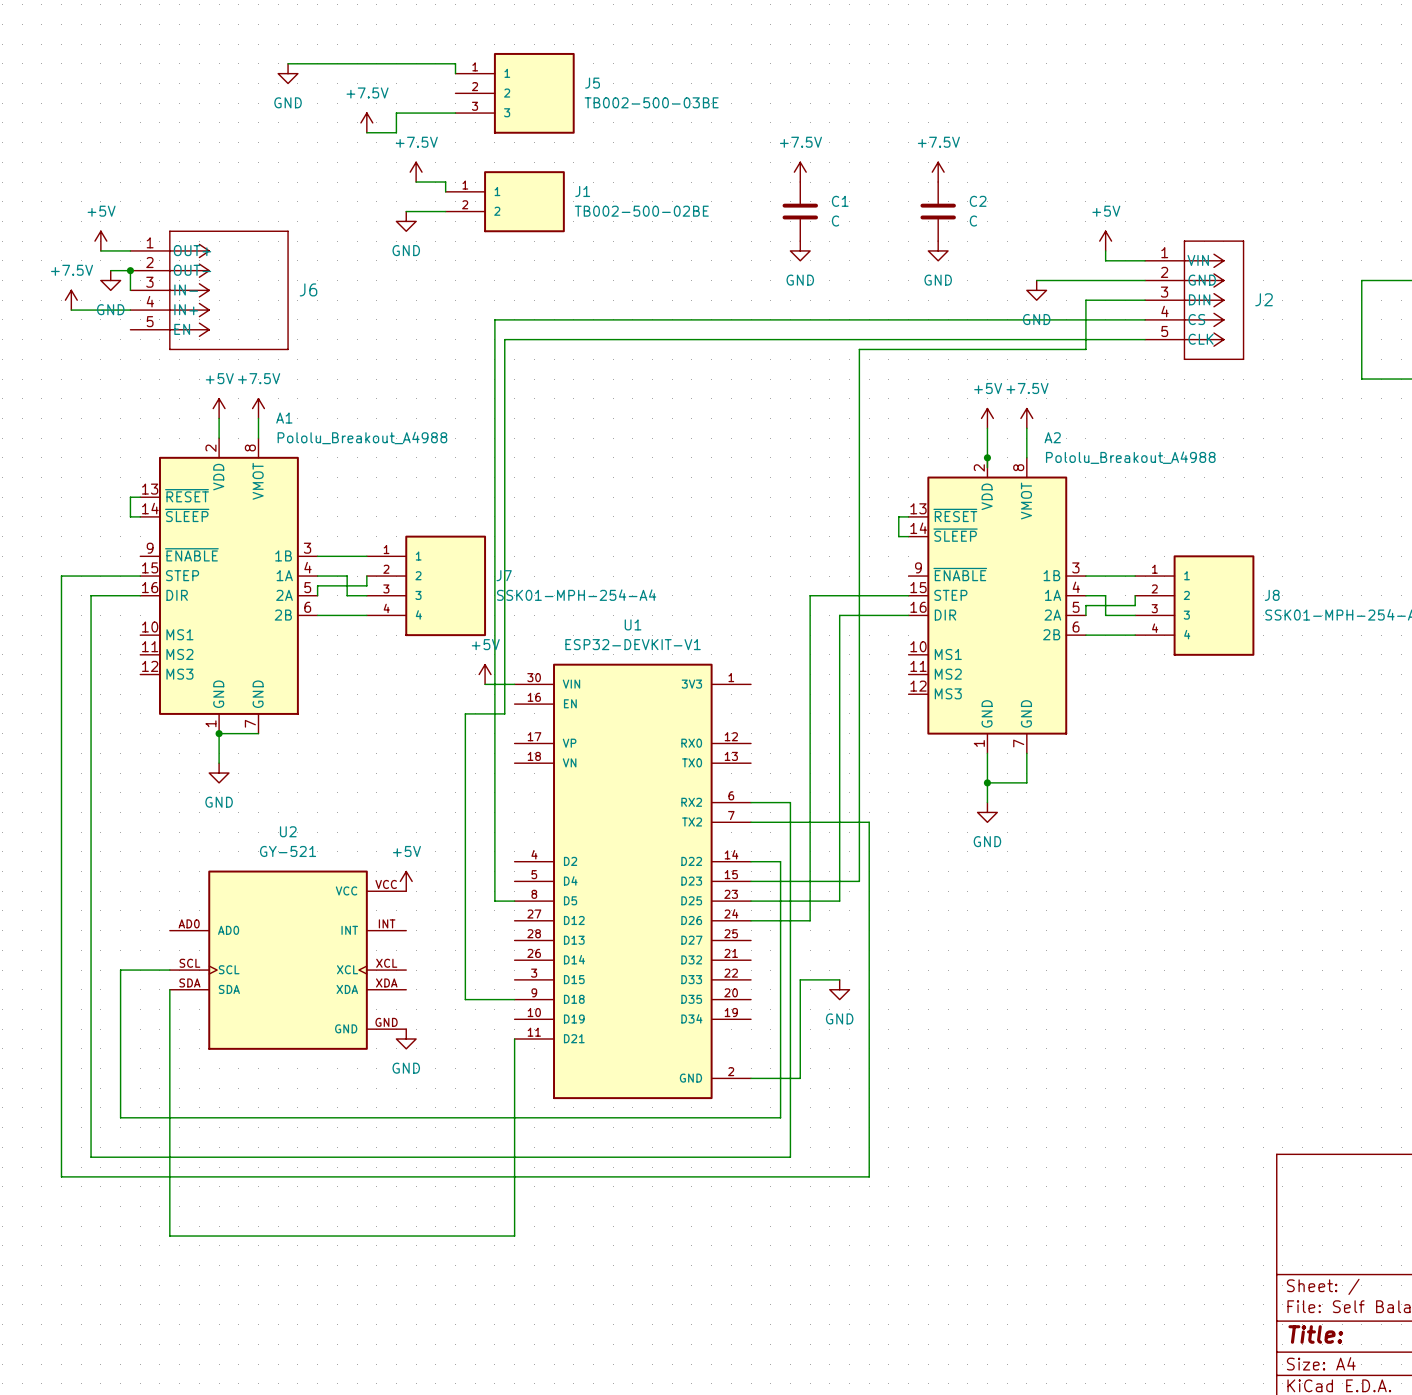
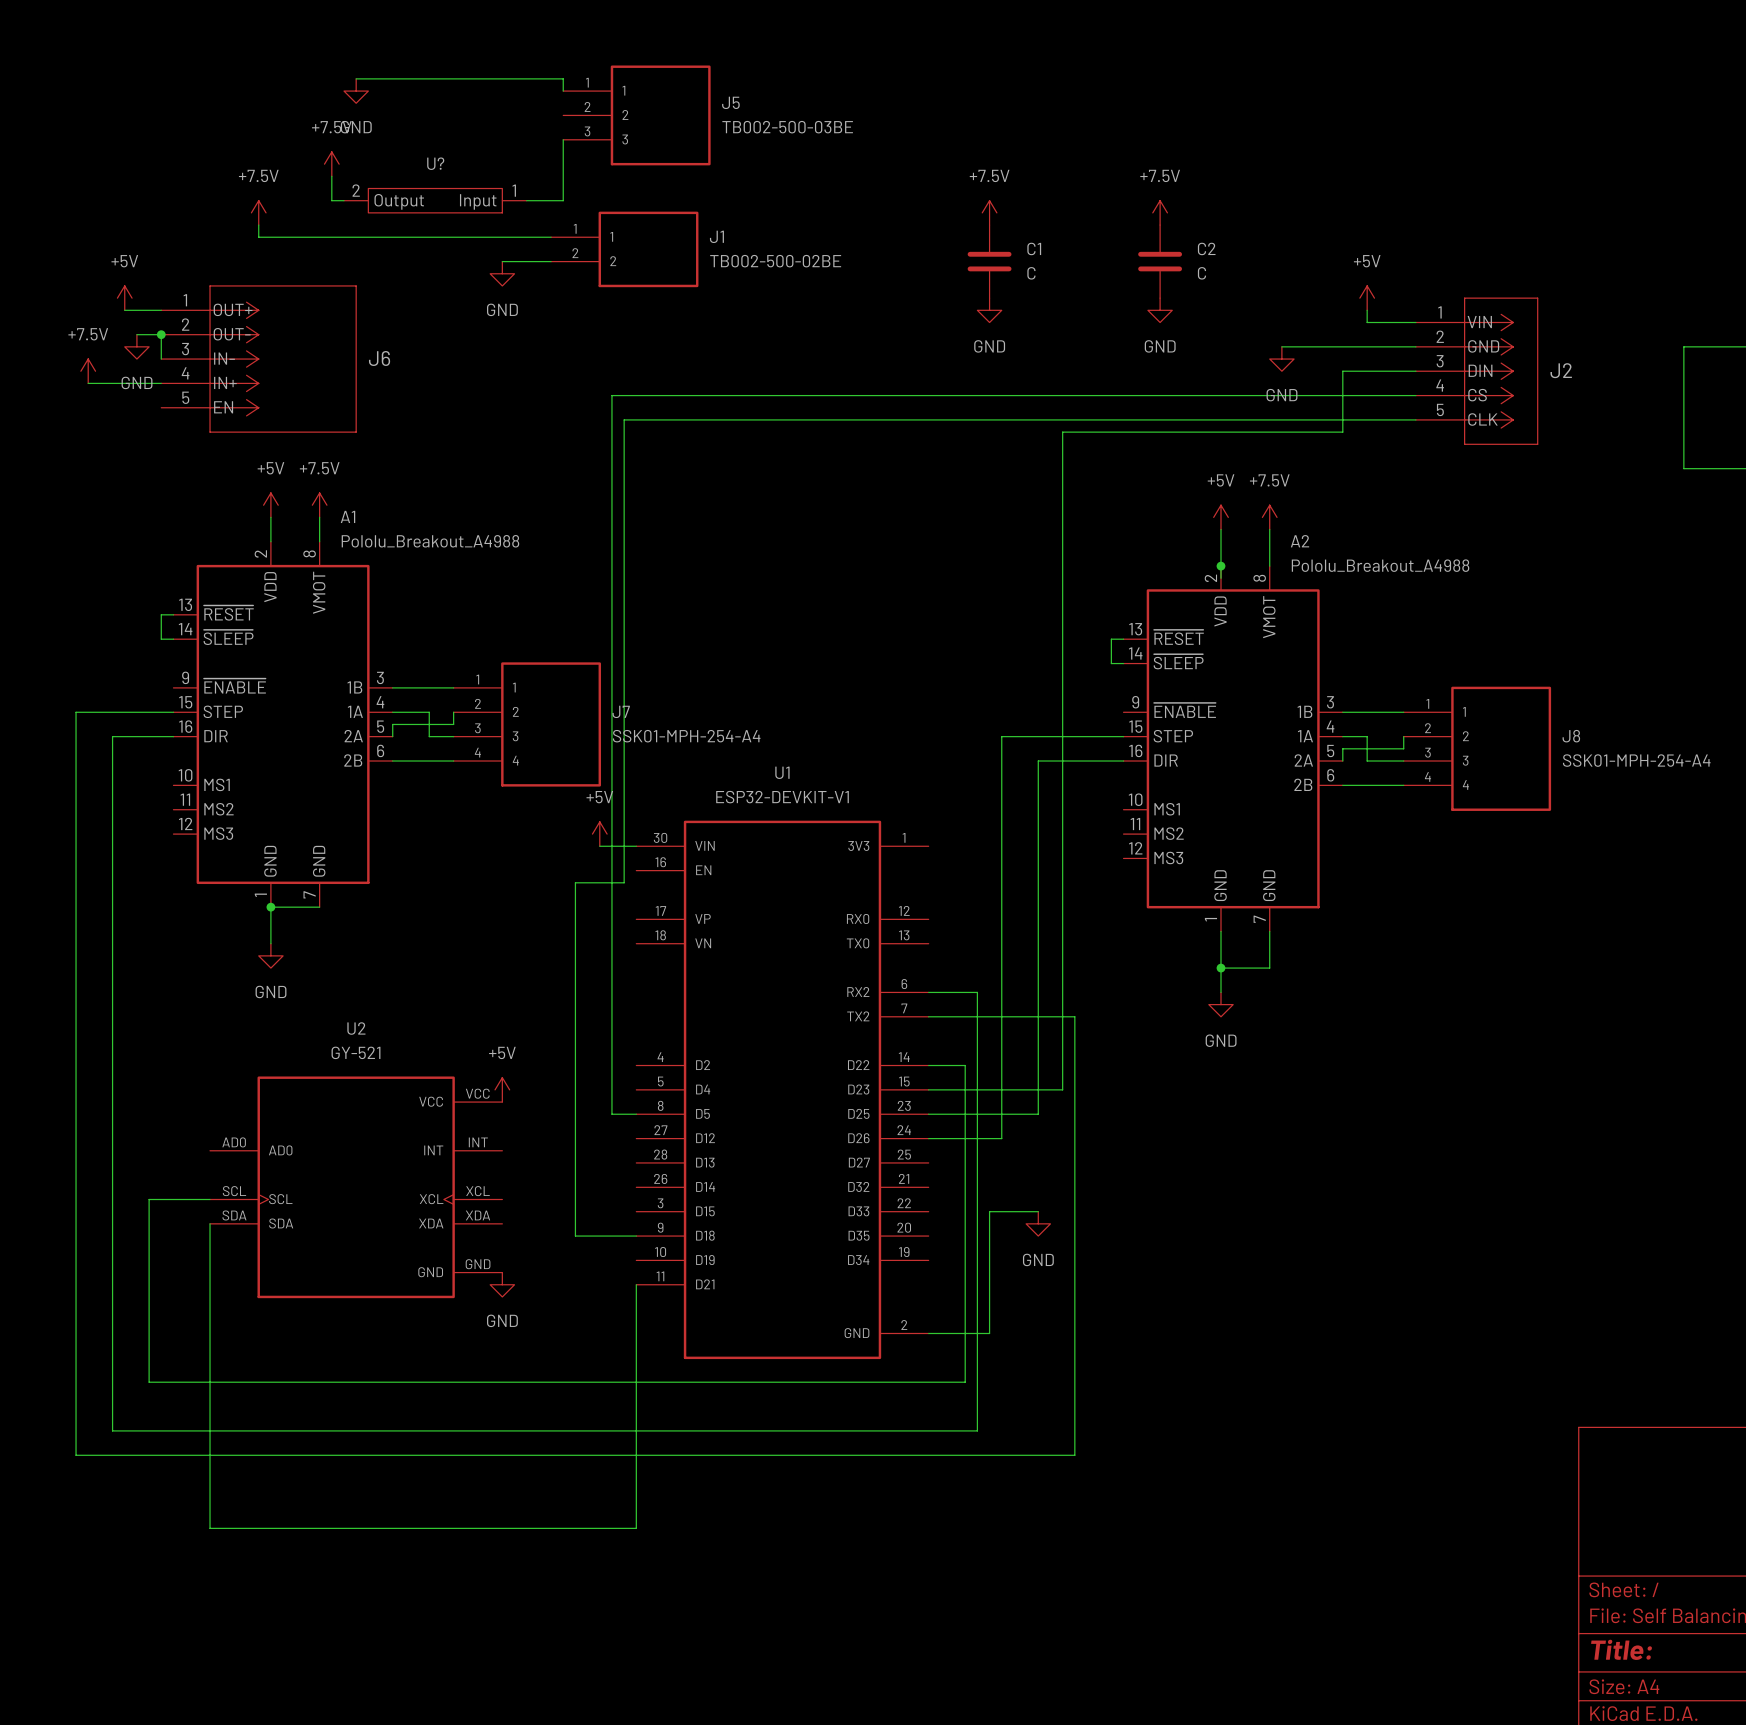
wire: (455, 113) (396, 113) (396, 132) (366, 132) -> (563, 139) (563, 200) (526, 200)
power symbol: +7.5V (366, 122) -> none
power symbol: none -> +7.5V (331, 164)
wire: none -> (331, 176) (331, 200) (344, 200)
U?: none -> (435, 200)
power symbol: none -> +7.5V (258, 212)
power symbol: +7.5V (416, 172) -> none
wire: (416, 182) (445, 182) (445, 191) -> (258, 225) (258, 237) (551, 237)

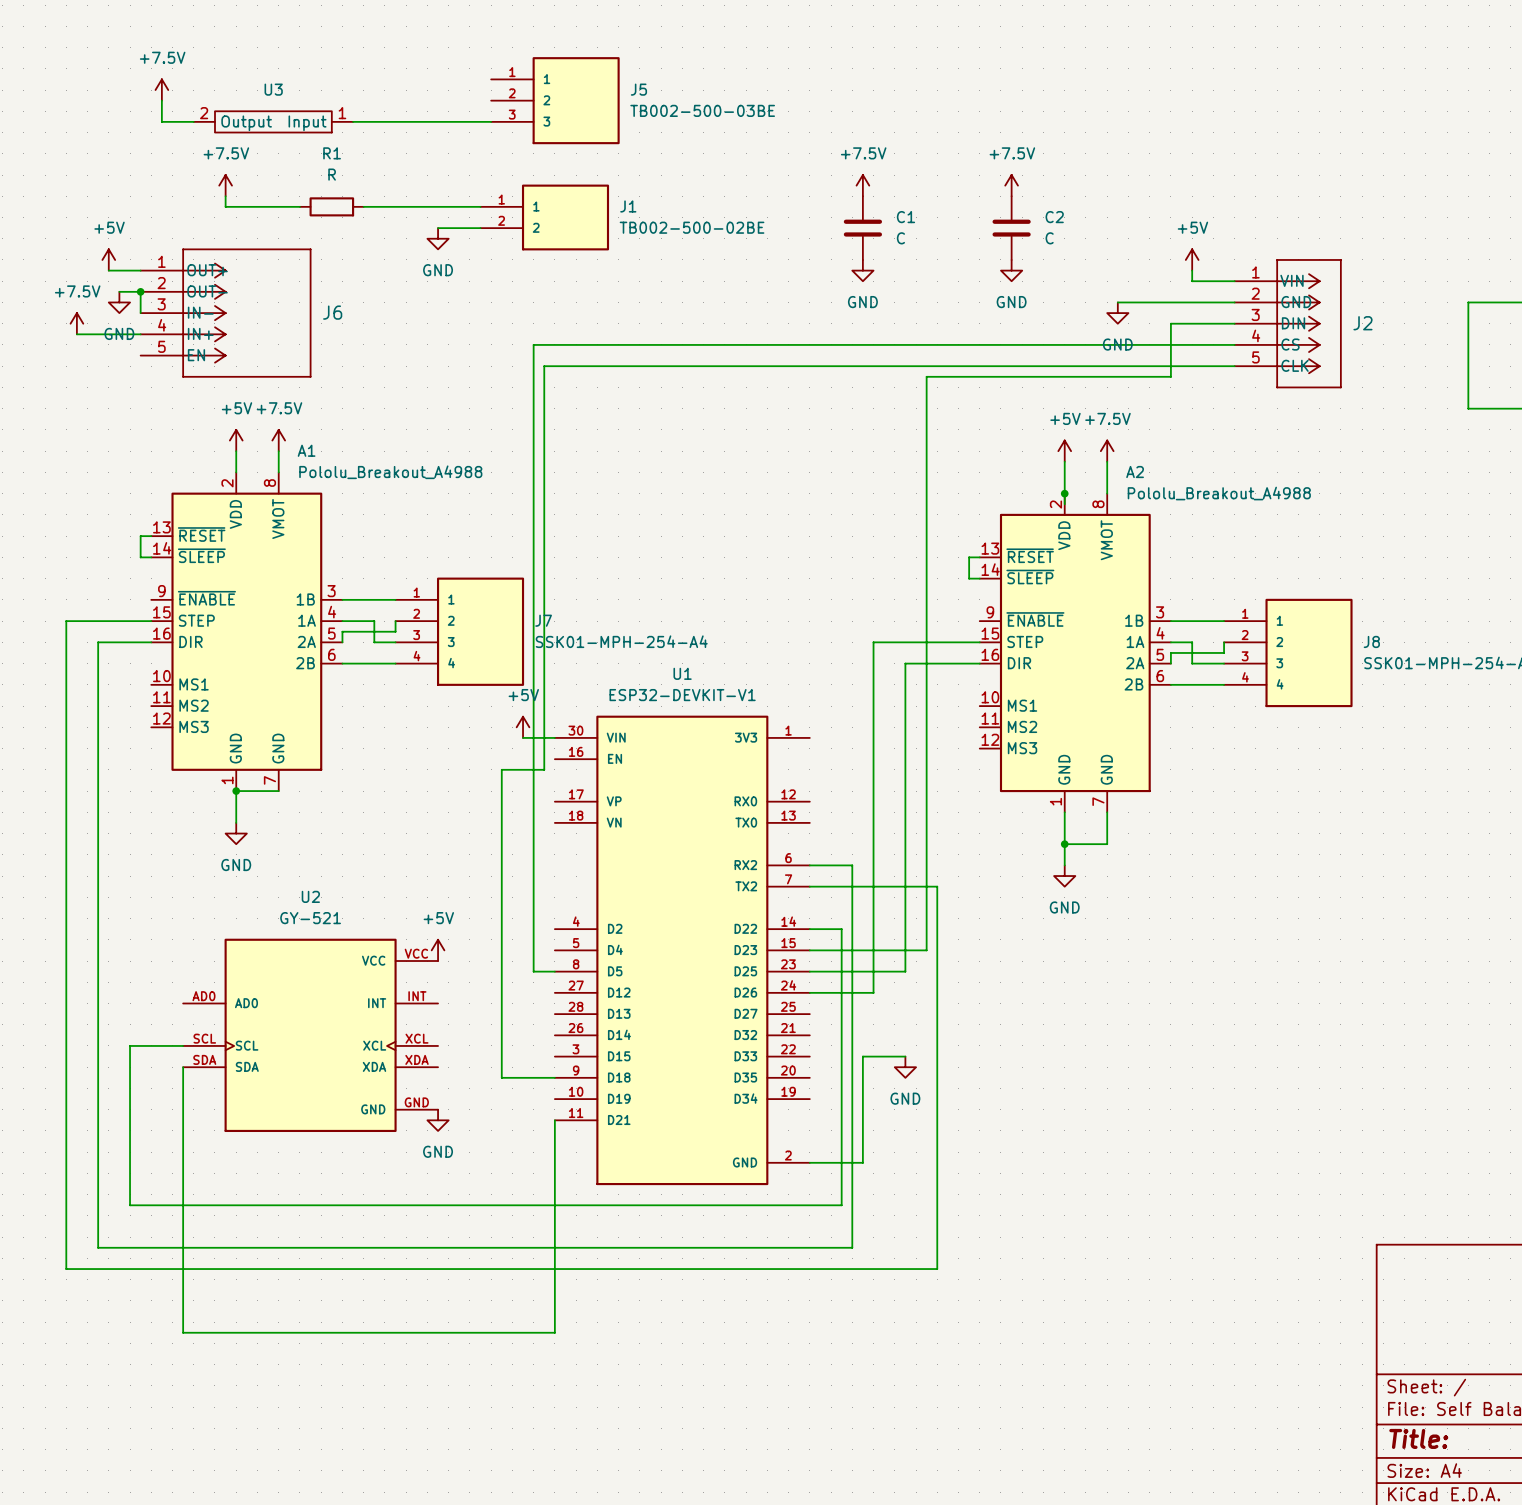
wire: (356, 78) (563, 78) (563, 91) -> none
power symbol: GND (356, 91) -> none
wire: none -> (161, 100) (161, 121) (193, 121)
U3: none -> (273, 121)
wire: (563, 139) (563, 200) (526, 200) -> (491, 121) (353, 121)
power symbol position: +7.5V (331, 164) -> +7.5V (161, 90)
wire: (331, 176) (331, 200) (344, 200) -> none
U?: (435, 200) -> none
wire: (344, 237) (417, 237) -> none
R1: none -> R (331, 206)

